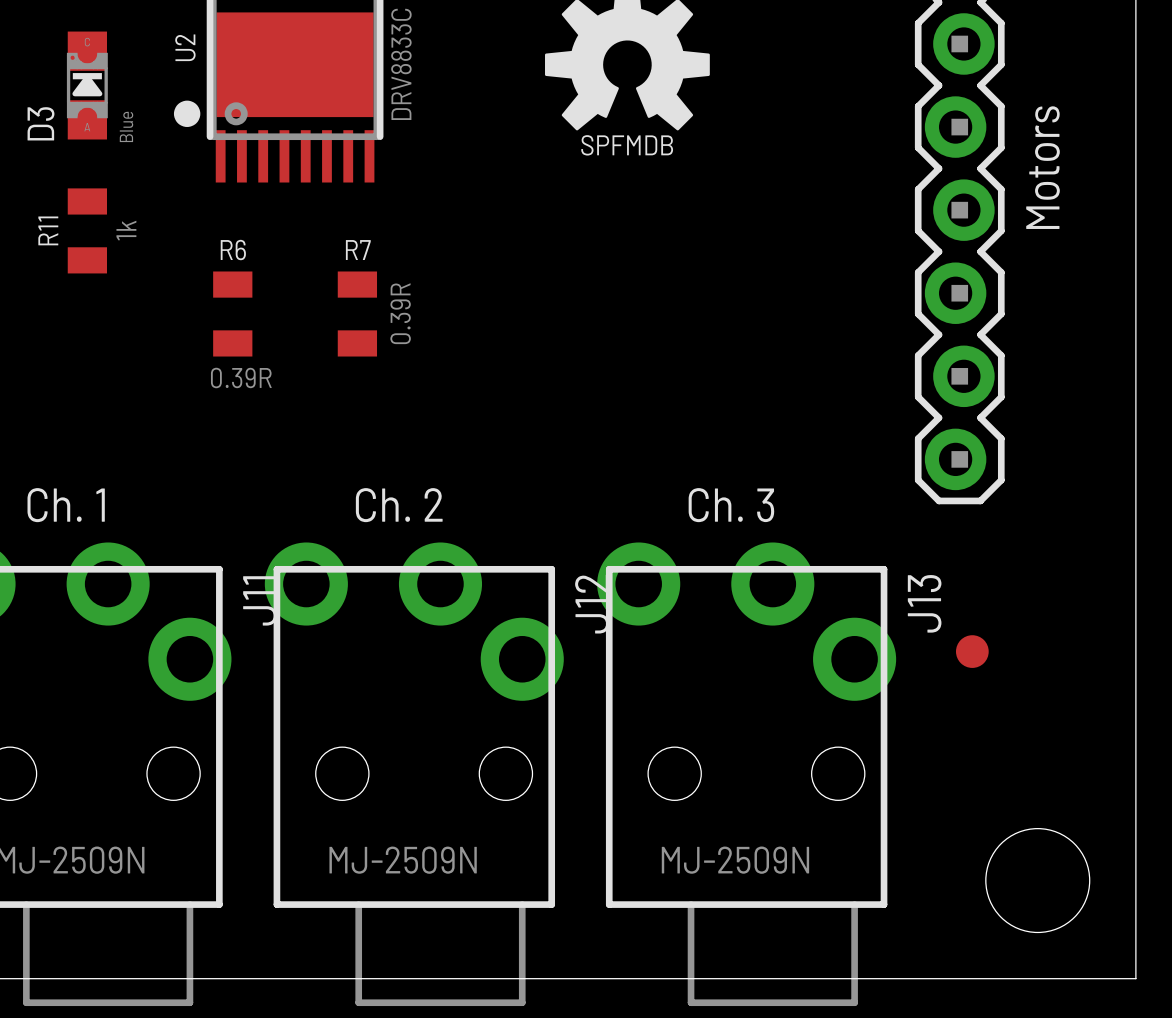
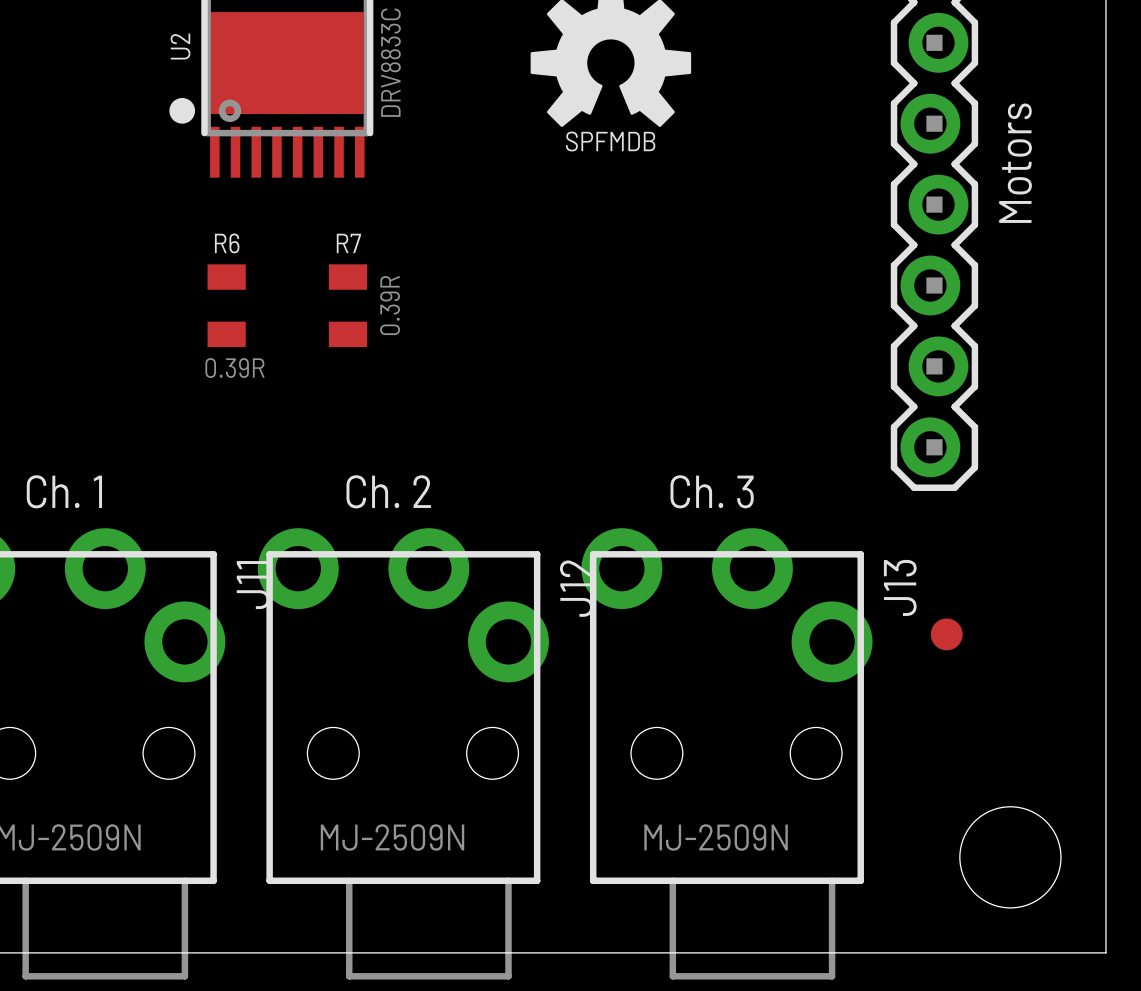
D3: Blue (87, 85) -> none
R11: 1k (87, 230) -> none

